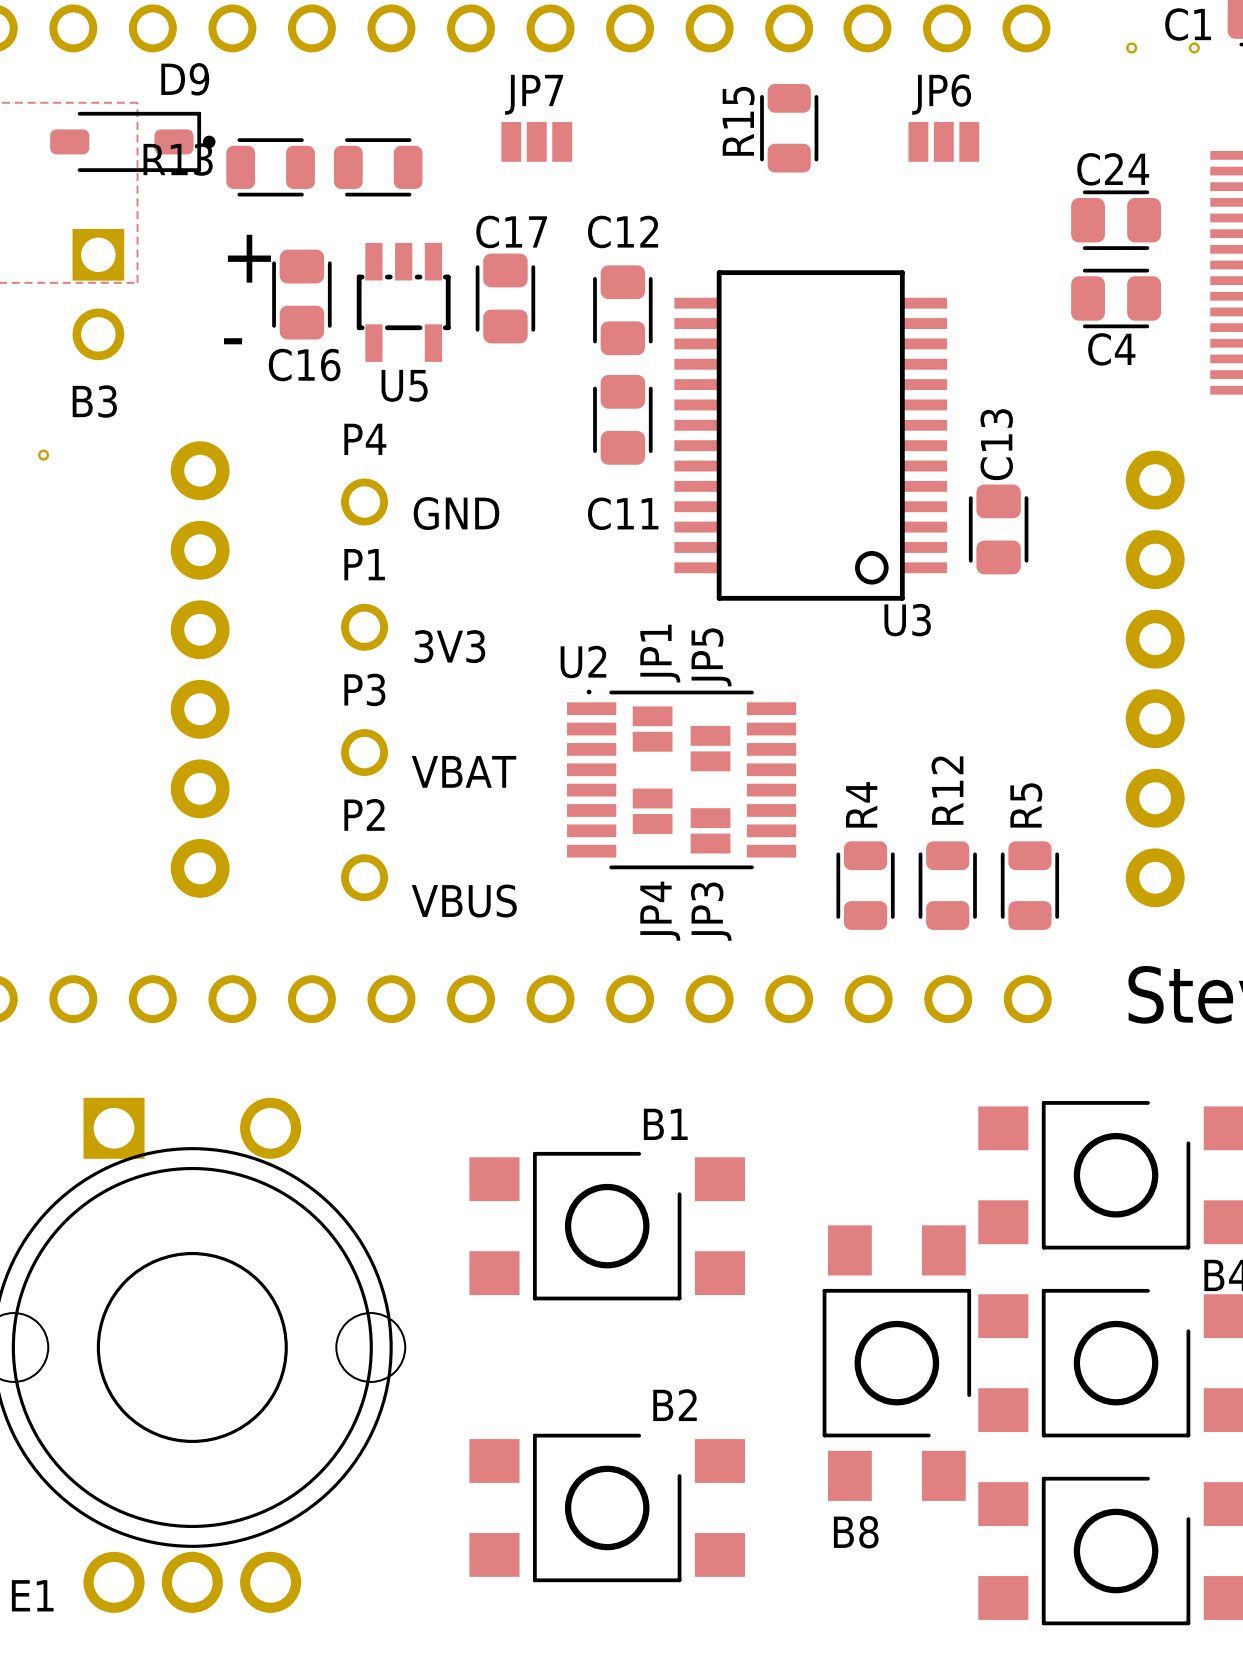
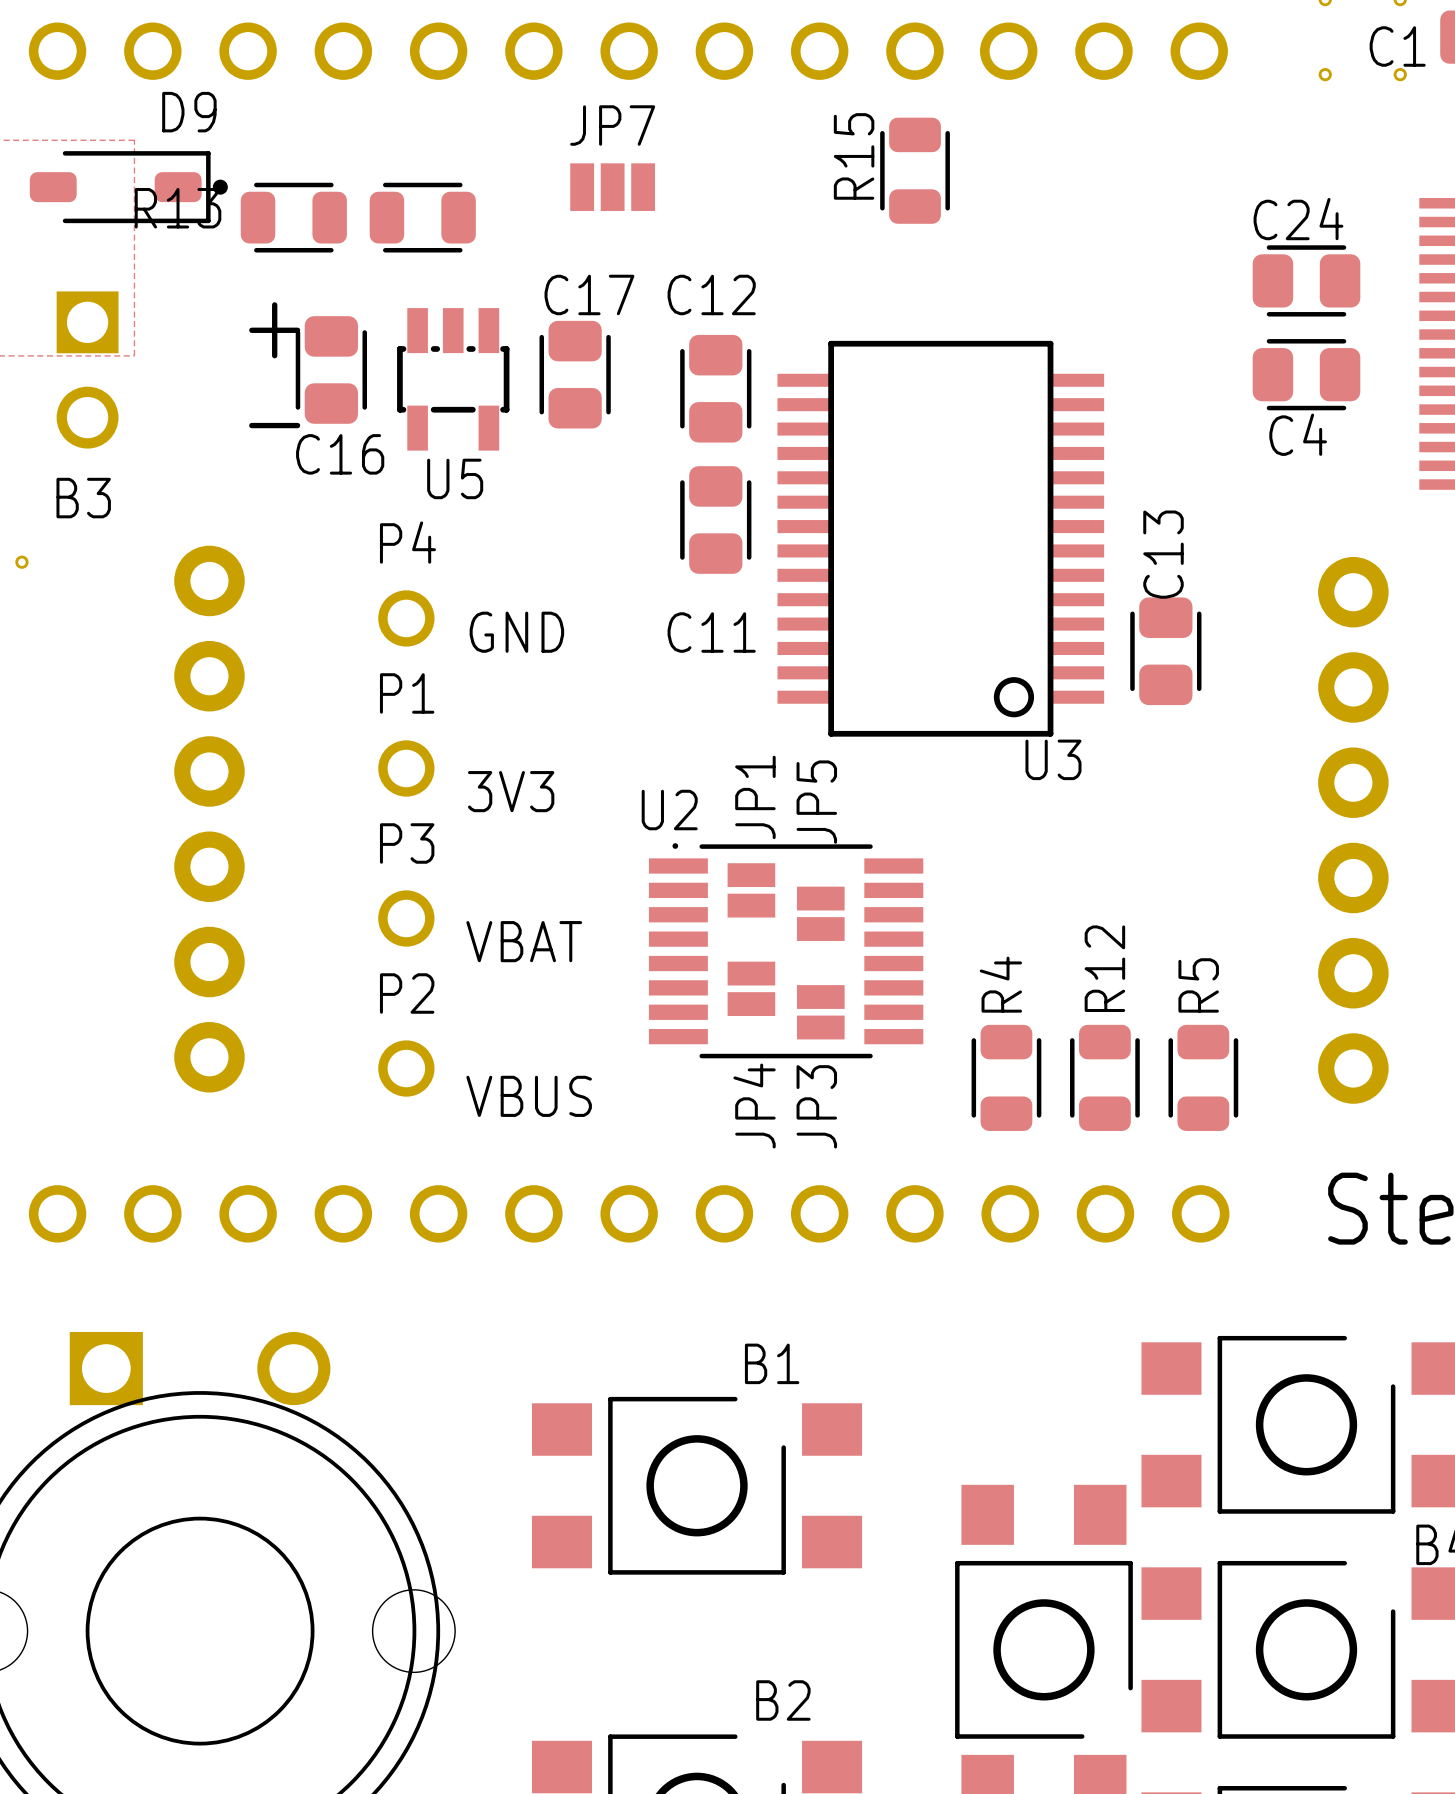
JP6: (943, 141) -> none

